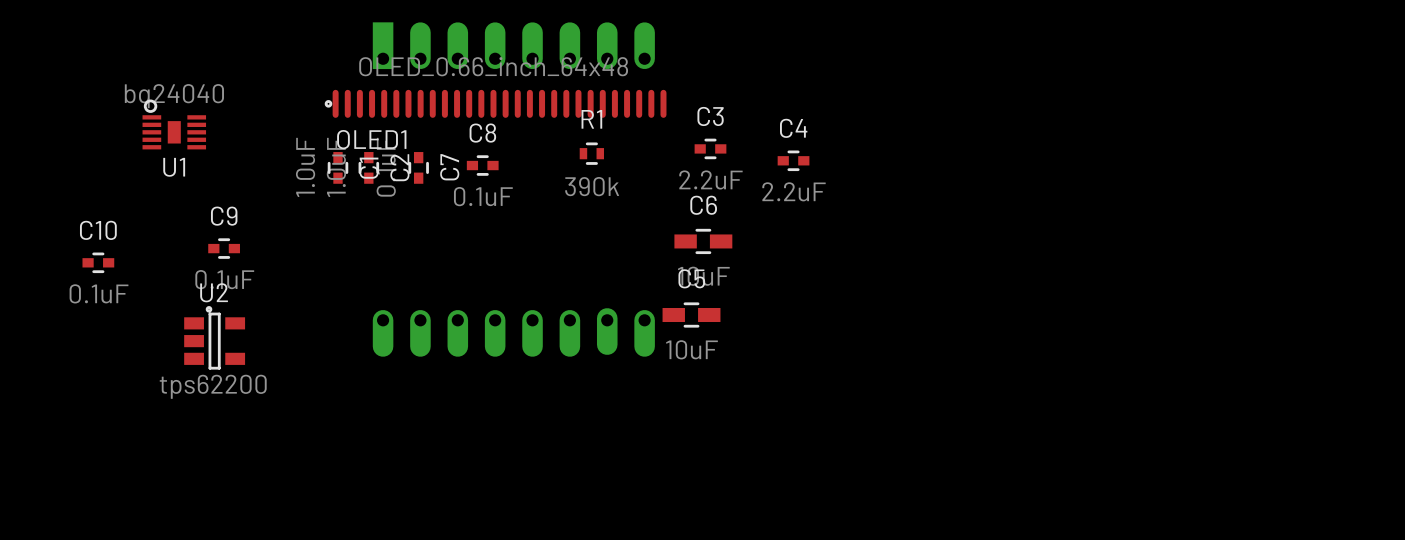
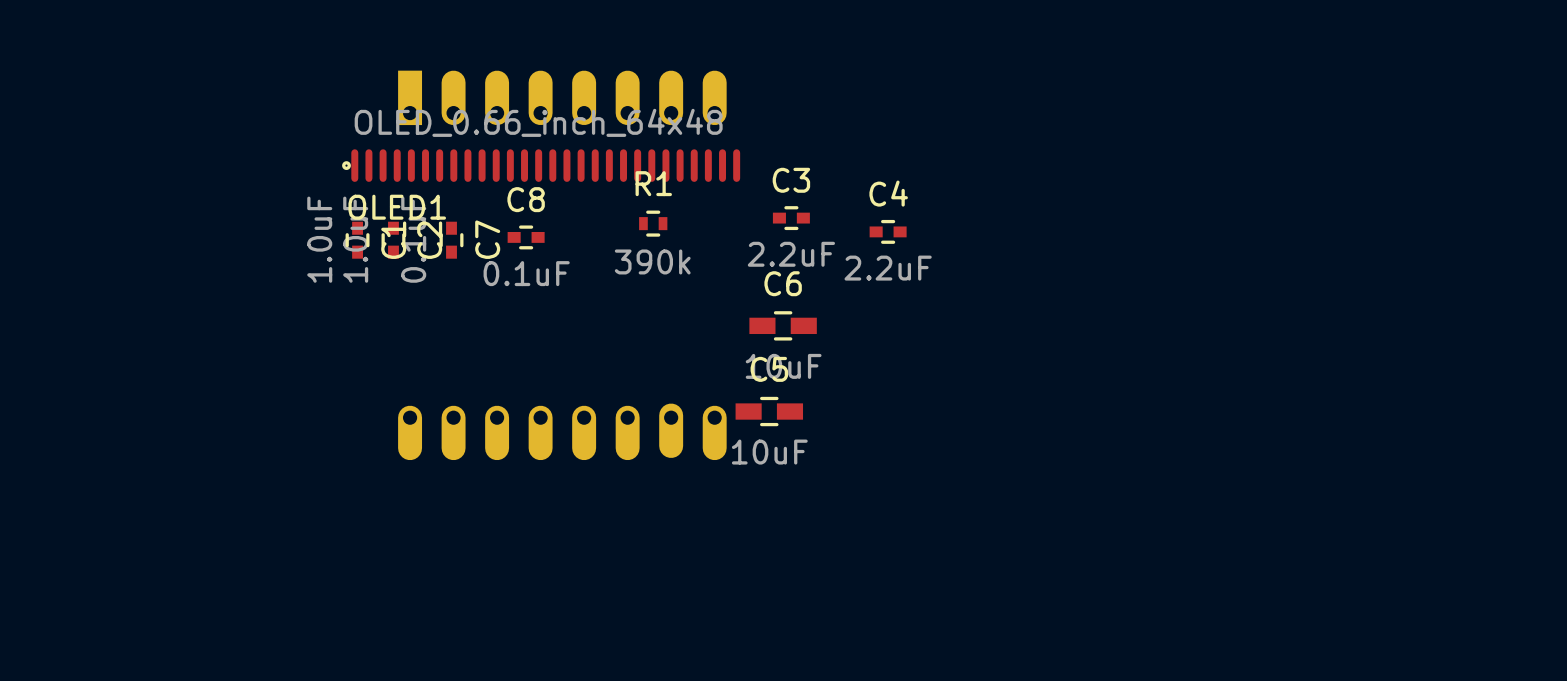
U1: bq24040 (174, 124) -> none
C9: 0.1uF (224, 248) -> none
C10: 0.1uF (98, 262) -> none
U2: tps62200 (214, 337) -> none

